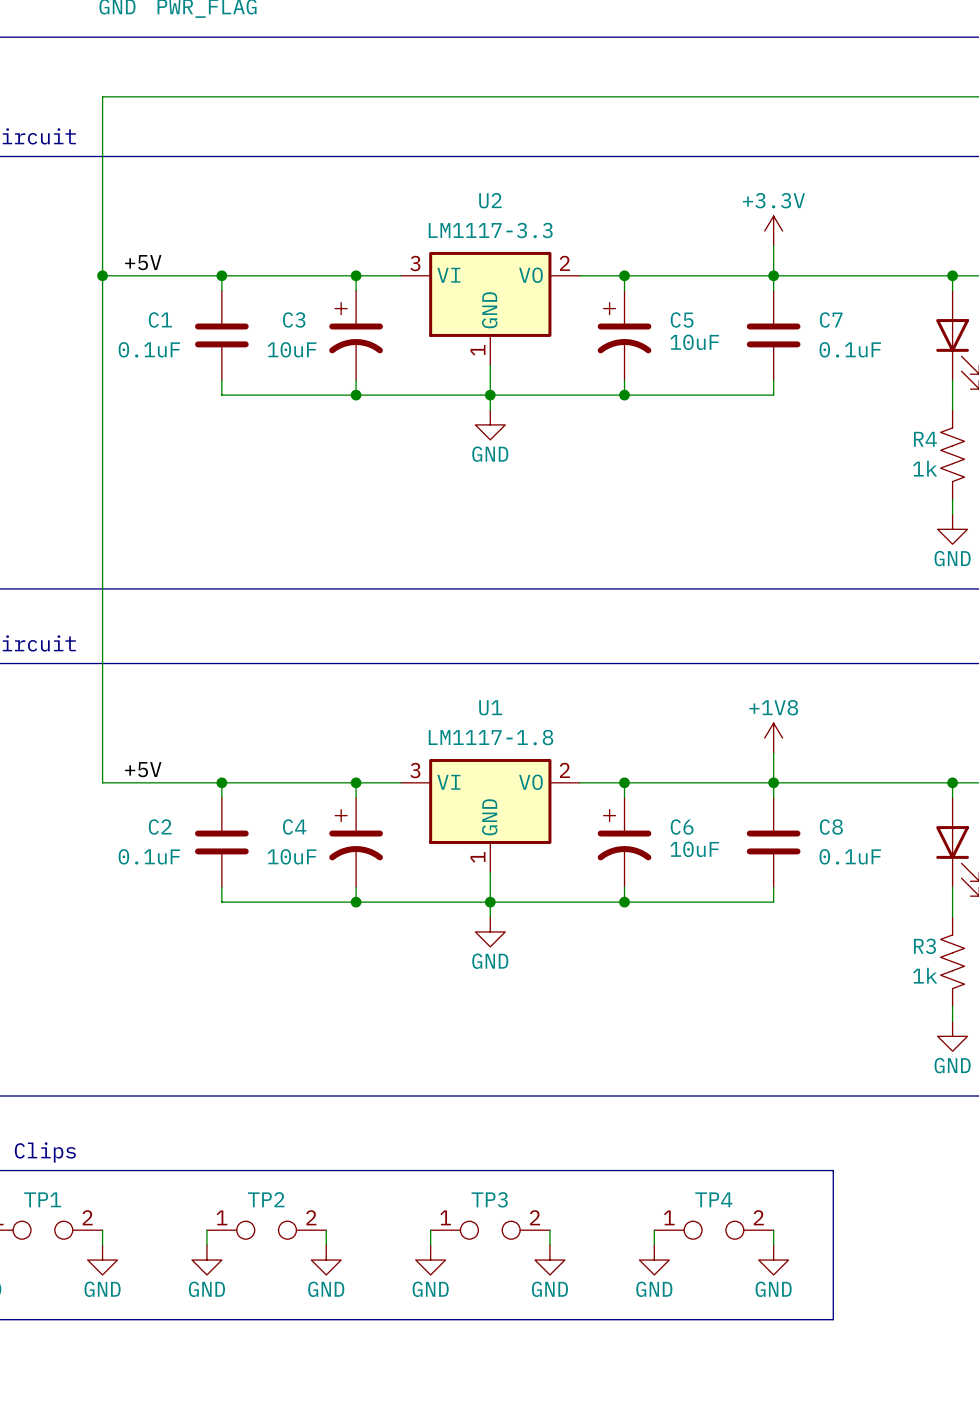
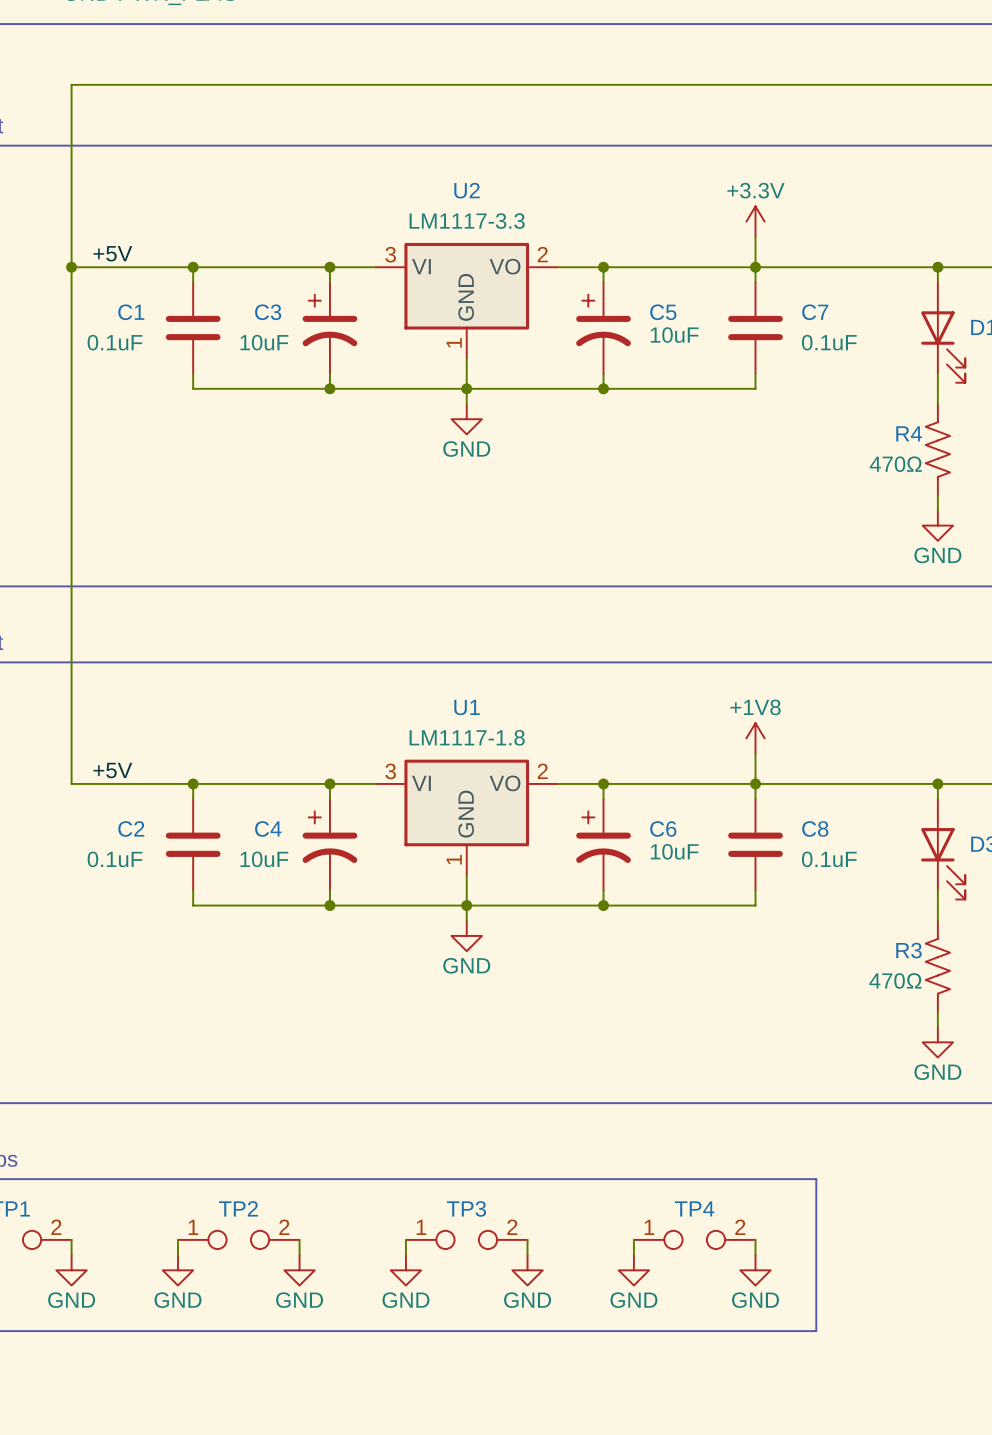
R4 value: 1k (925, 468) -> 470Ω (895, 464)
R3 value: 1k (925, 975) -> 470Ω (895, 980)

